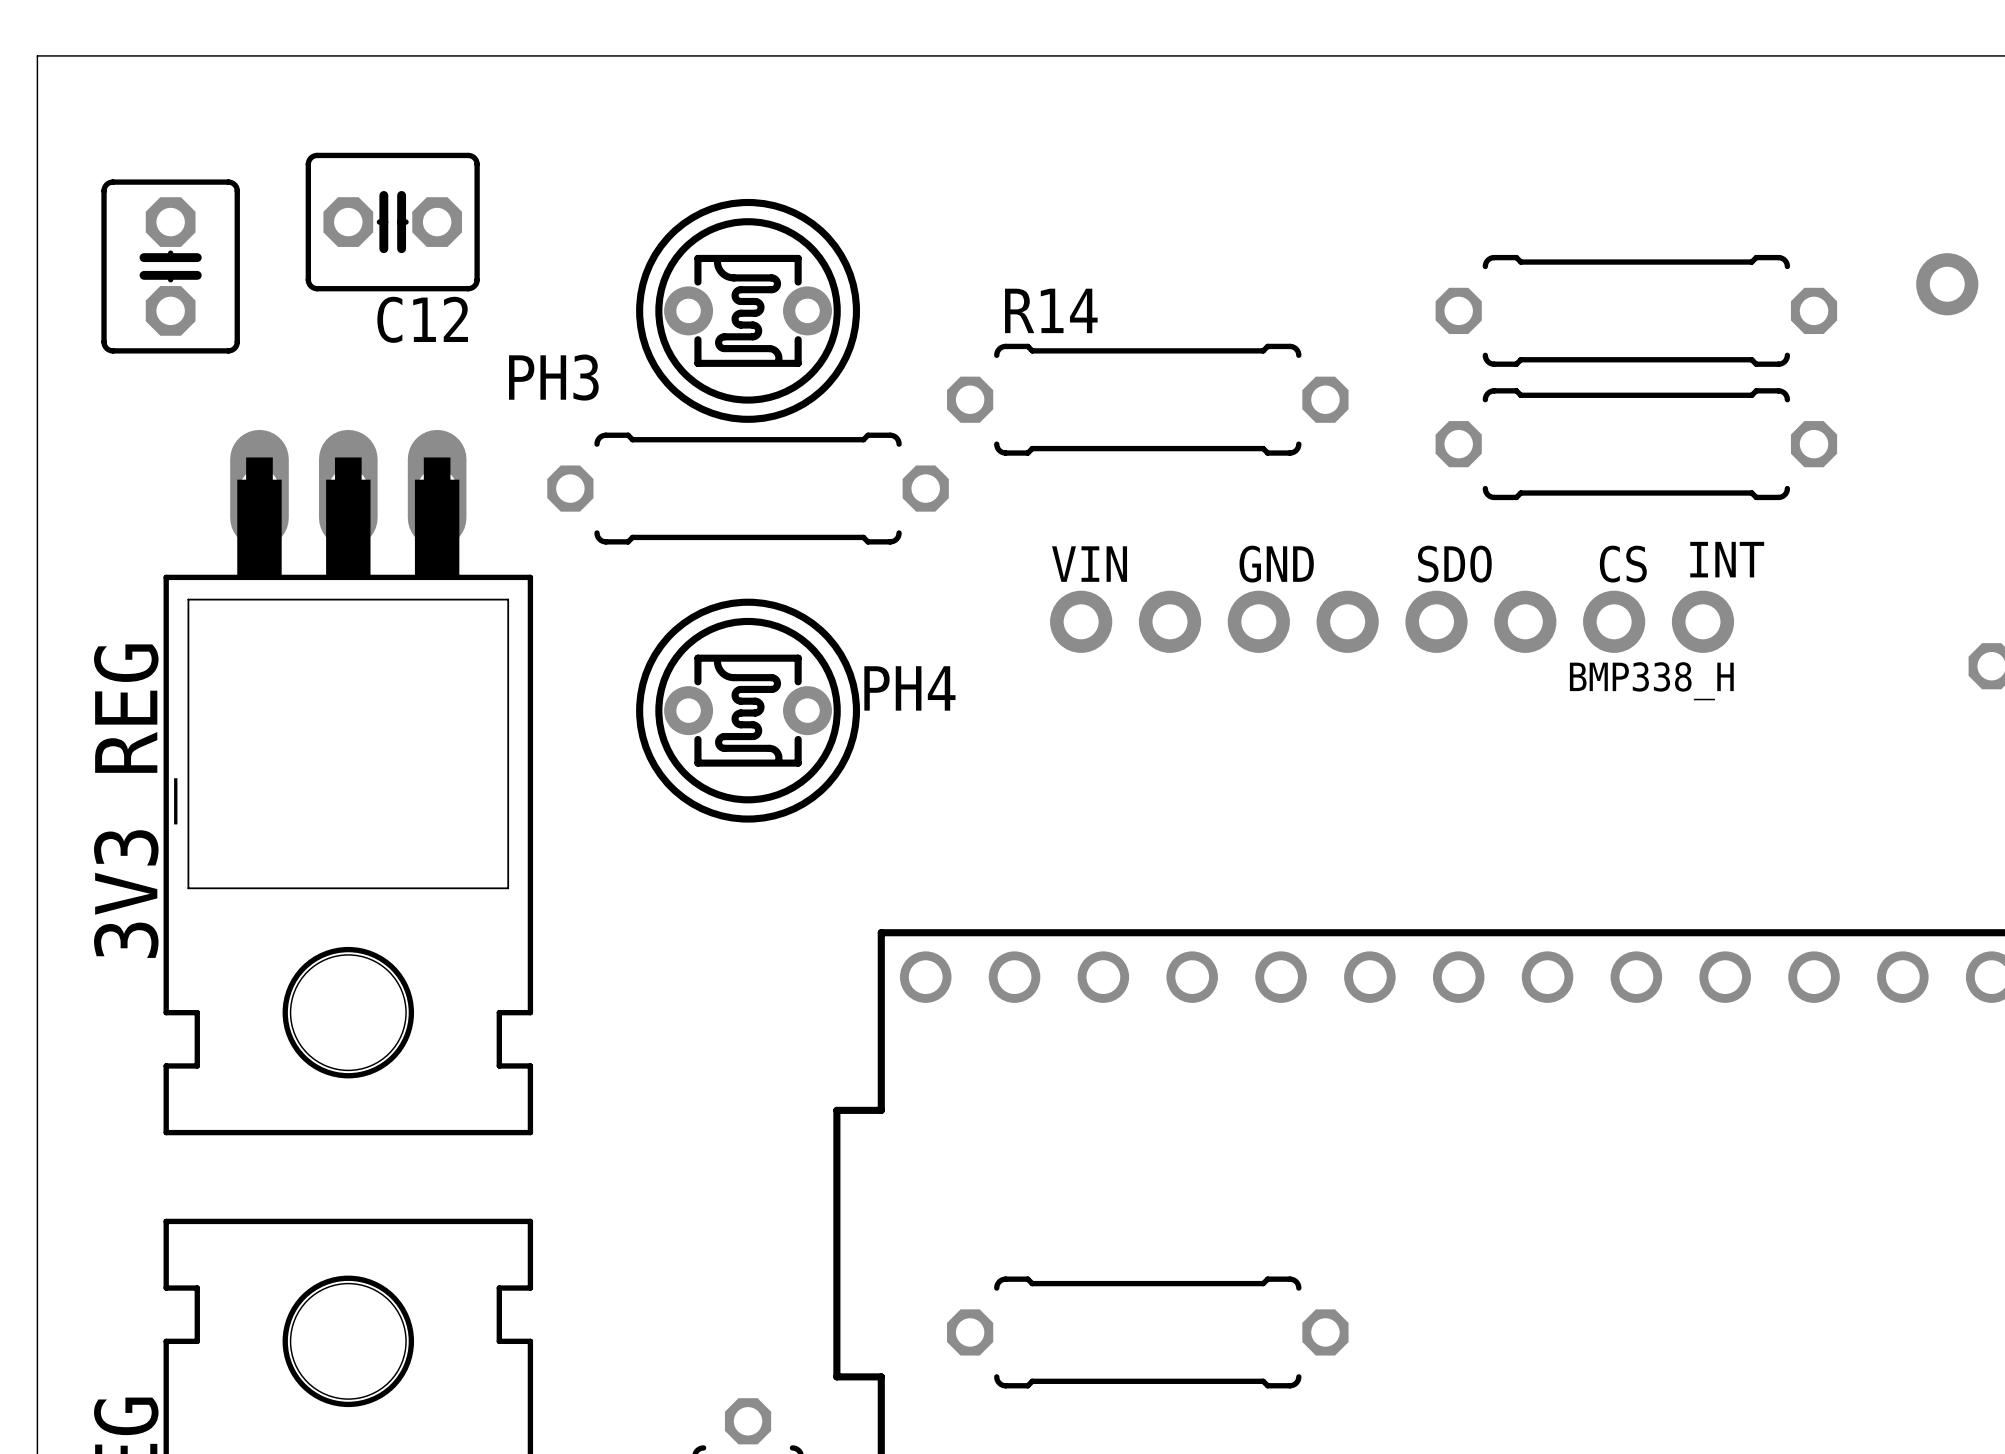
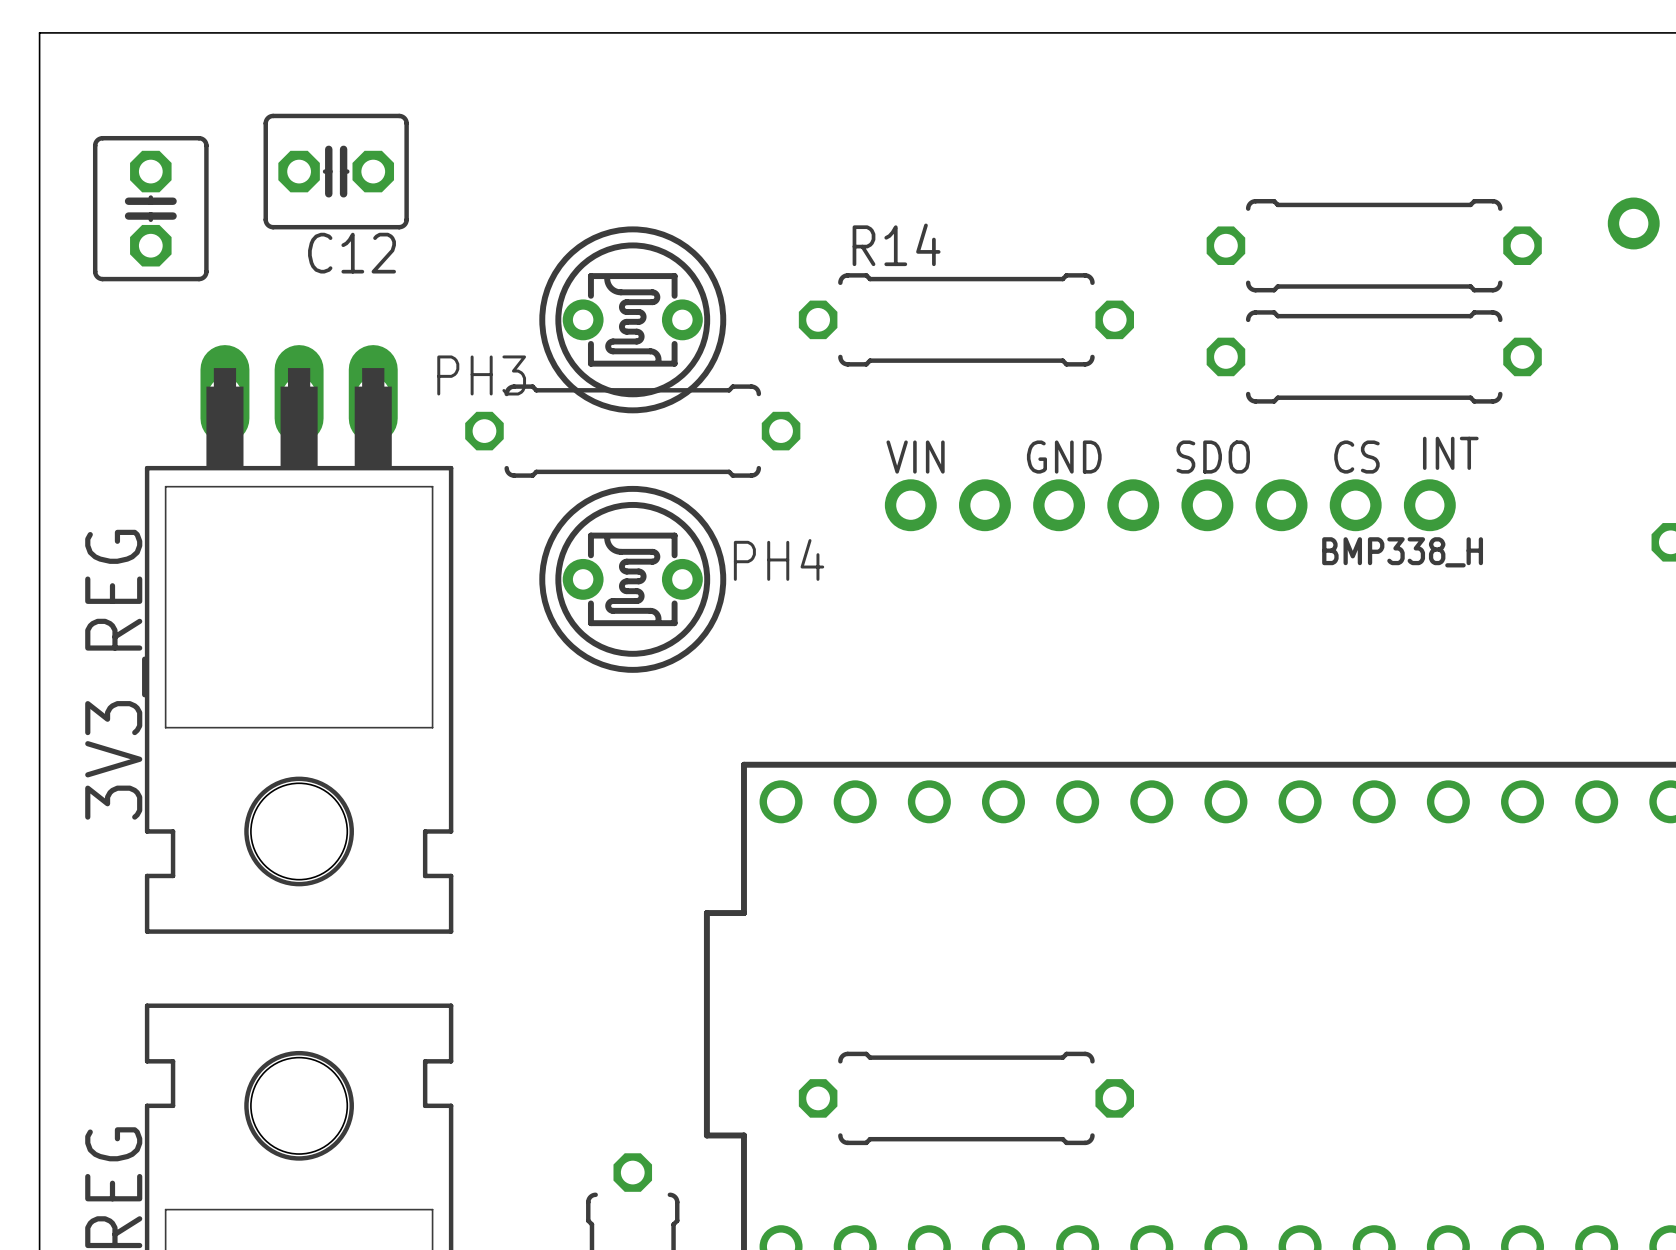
PH3 position: (748, 310) -> (632, 319)
part position: (748, 488) -> (632, 431)

